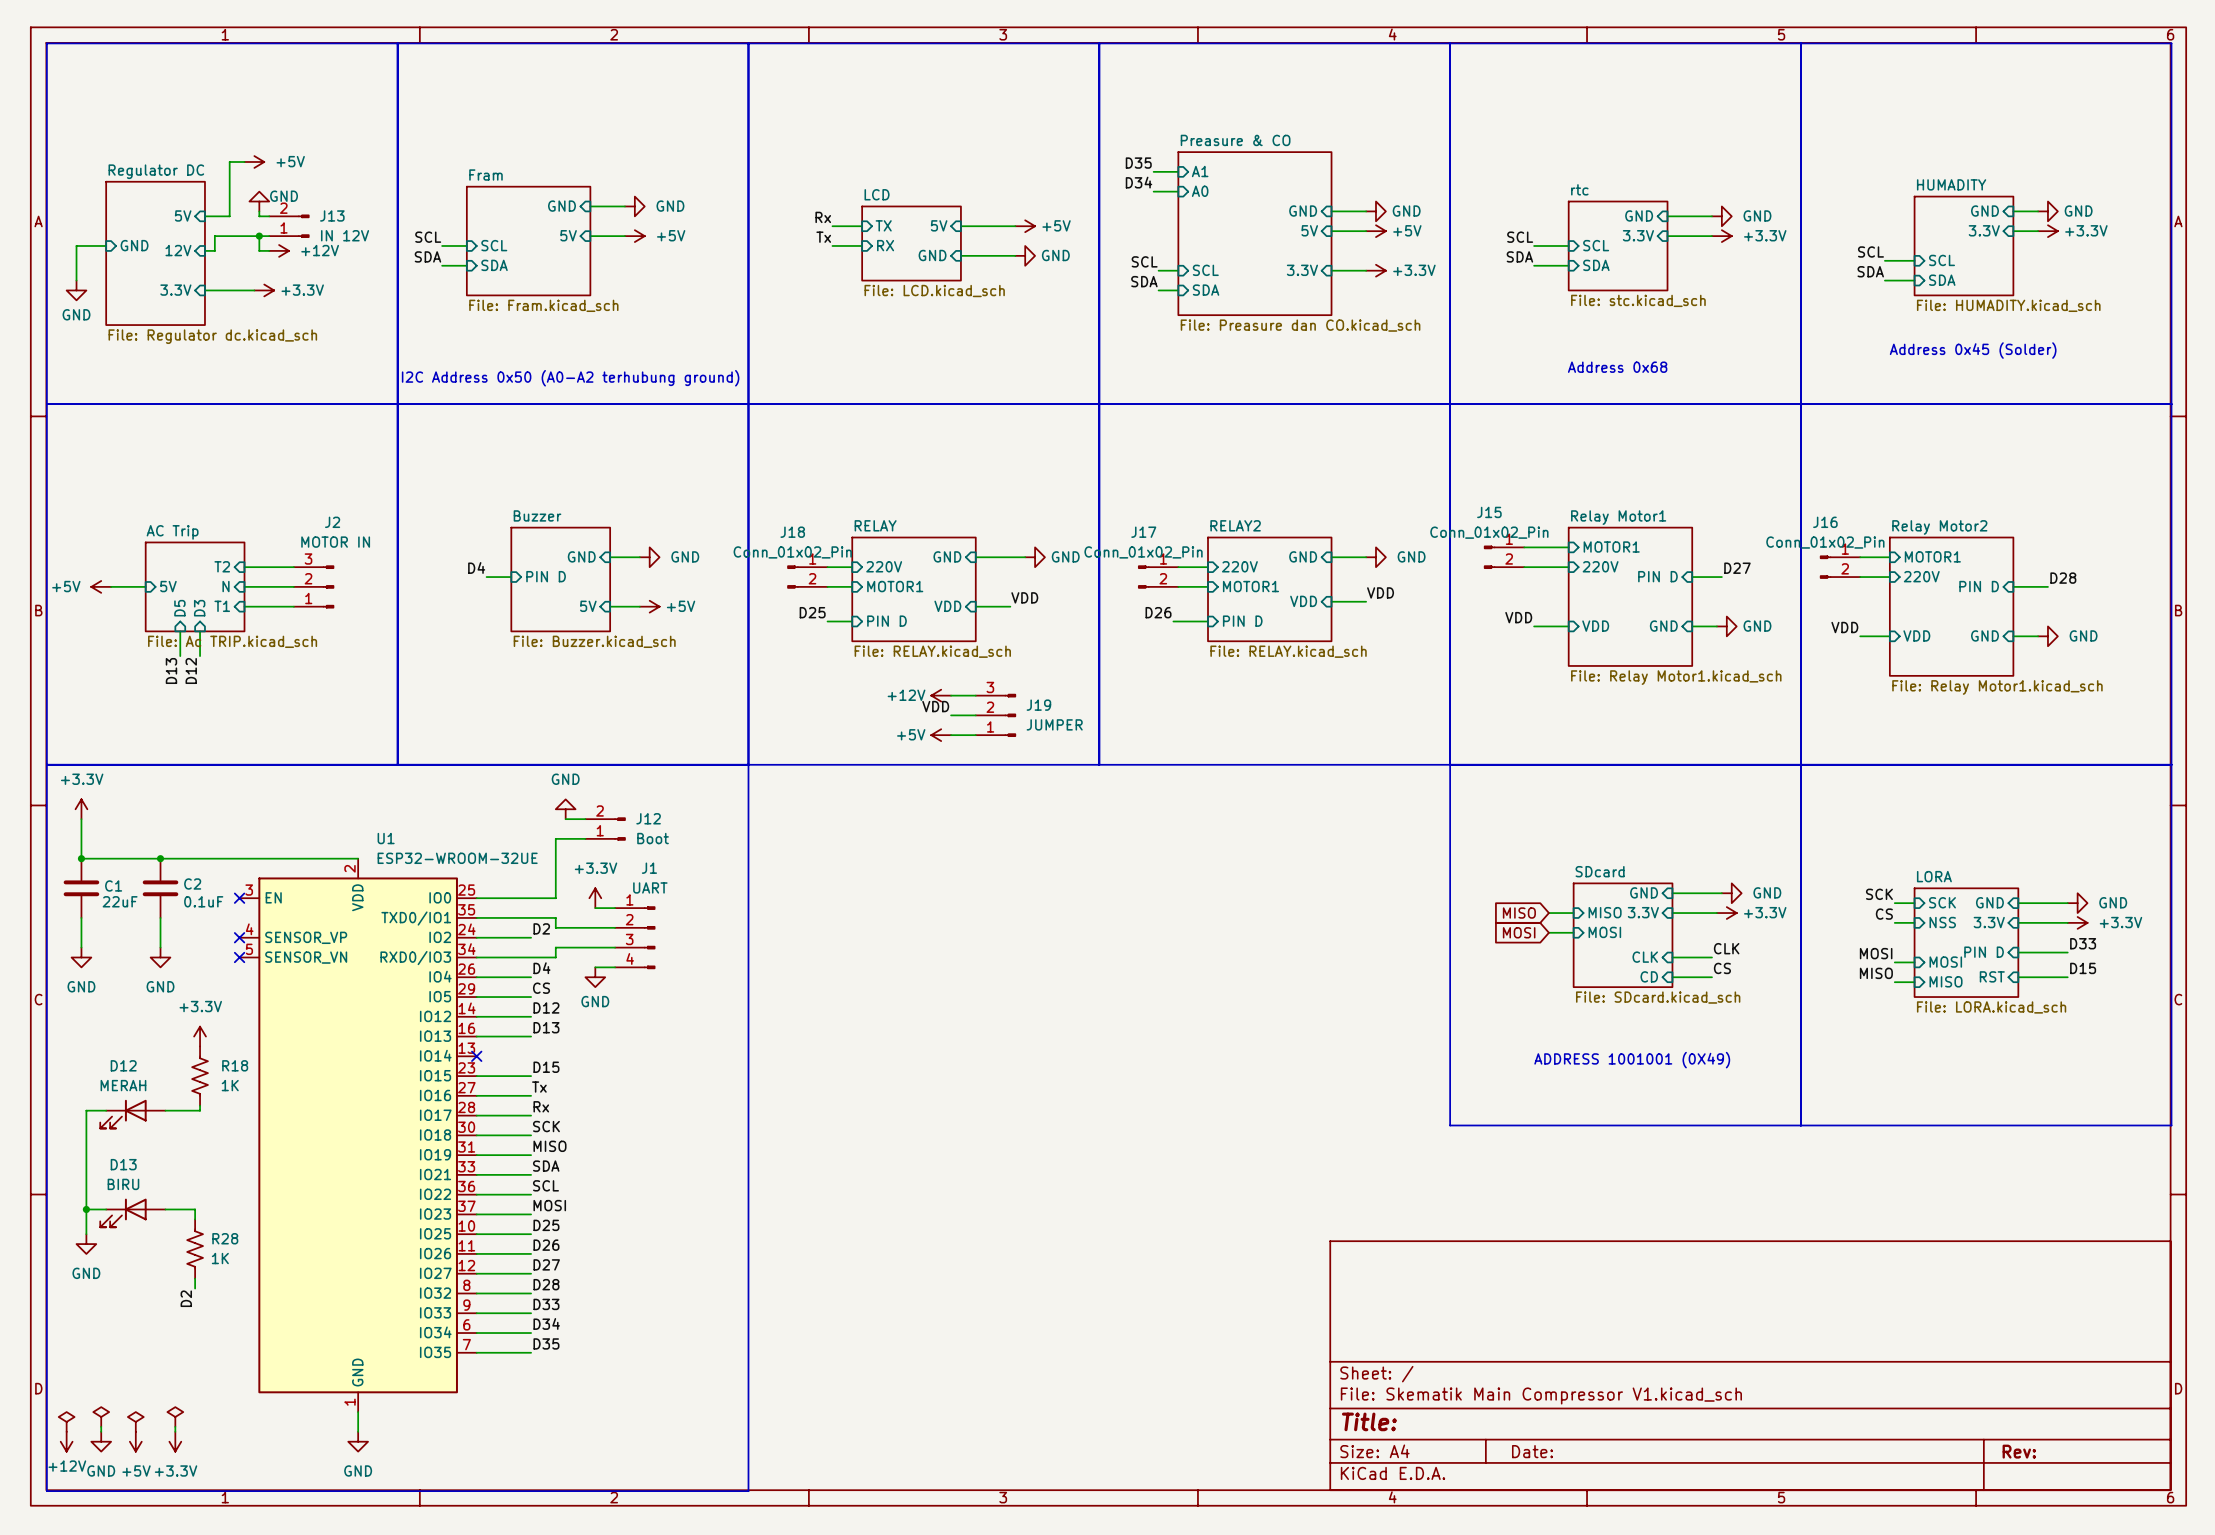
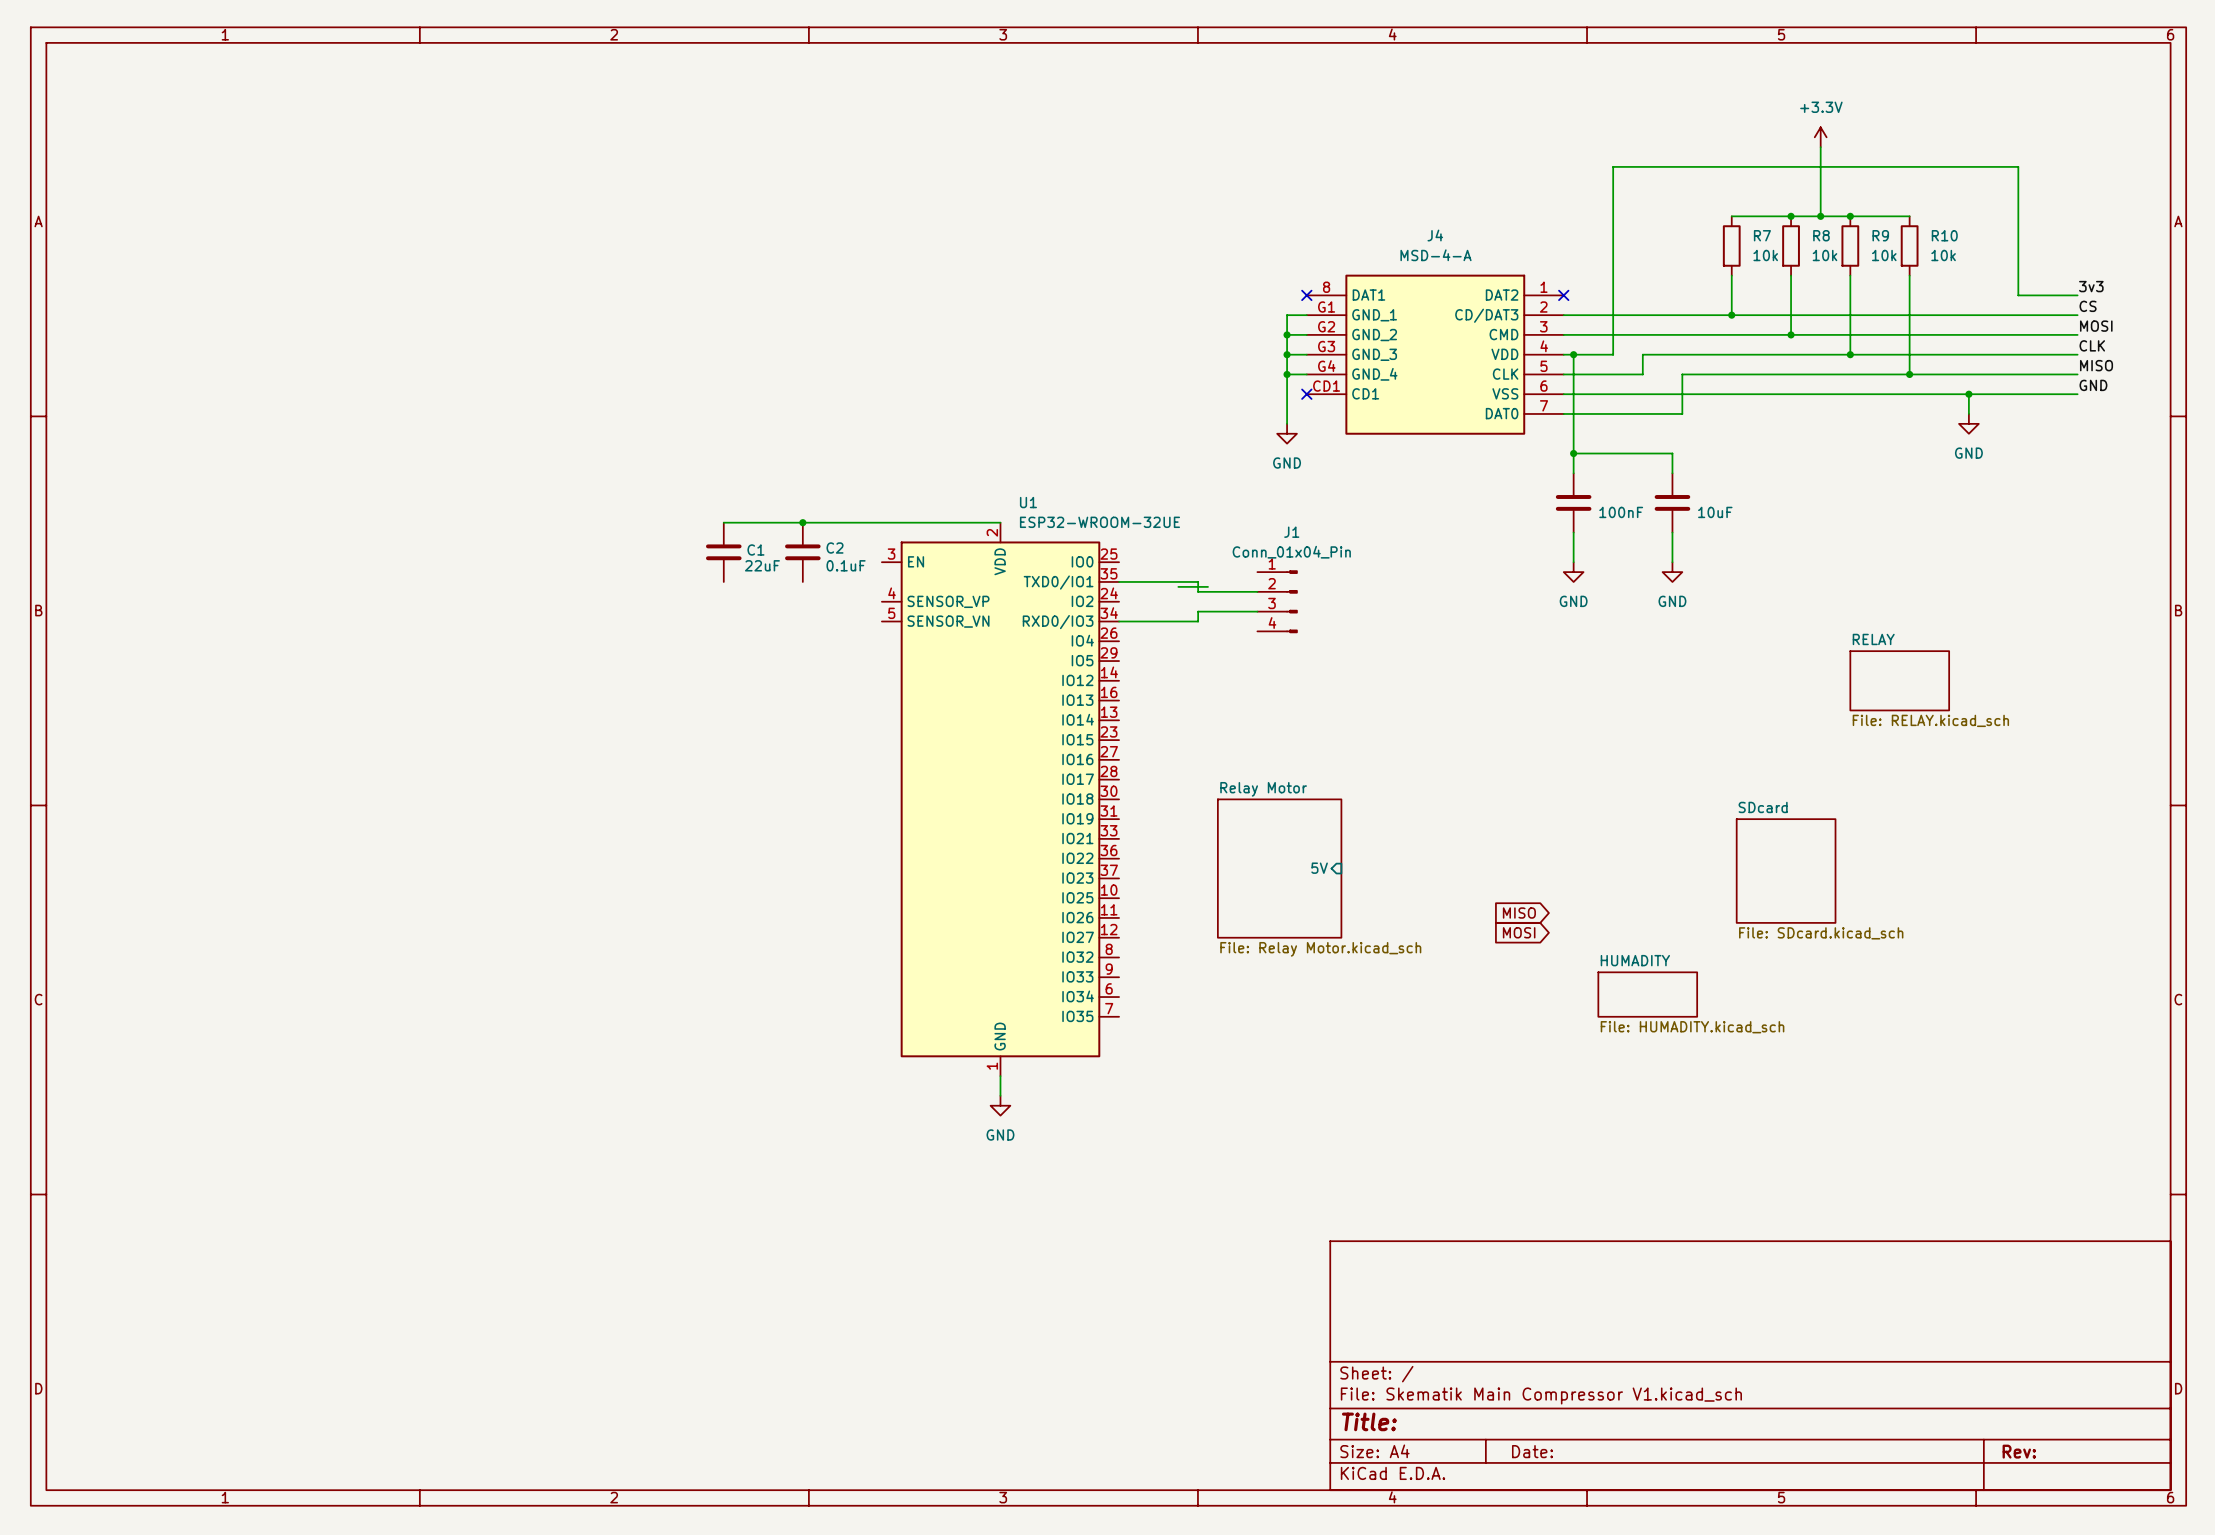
line: (397, 43) (397, 764) -> none
line: (748, 43) (748, 1491) (46, 1491) (46, 43) (2171, 43) (2171, 1125) (1450, 1125) (1450, 43) -> none
line: (1099, 43) (1099, 764) -> none
line: (1800, 43) (1800, 1125) -> none
power symbol: none -> +3.3V (1820, 137)
wire: none -> (1820, 147) (1820, 216)
wire: (244, 161) (229, 161) (229, 216) (204, 216) -> none
power symbol: +5V (254, 161) -> none
label: D35 (1138, 163) -> none
wire: (1153, 171) (1178, 171) -> none
sheet pin: A1 (1200, 171) -> none
label: D34 (1138, 182) -> none
wire: (1153, 191) (1178, 191) -> none
sheet pin: A0 (1200, 191) -> none
power symbol: GND (259, 201) -> none
sheet pin: GND (561, 206) -> none
wire: (590, 206) (624, 206) -> none
power symbol: GND (634, 206) -> none
wire: (259, 211) (259, 216) (269, 216) -> none
sheet pin: GND (1303, 211) -> none
wire: (1331, 211) (1366, 211) -> none
power symbol: GND (1376, 211) -> none
sheet pin: GND (1985, 211) -> none
wire: (2013, 211) (2038, 211) -> none
power symbol: GND (2047, 211) -> none
sheet pin: 5V (183, 215) -> none
sheet pin: GND (1639, 215) -> none
wire: (1667, 216) (1711, 216) -> none
power symbol: GND (1721, 216) -> none
wire: none -> (1731, 216) (1909, 216)
junction: none -> (1791, 216)
junction: none -> (1820, 216)
junction: none -> (1850, 216)
label: Rx (823, 217) -> none
sheet pin: TX (883, 225) -> none
sheet pin: 5V (939, 225) -> none
J13: IN 12V (289, 226) -> none
wire: (832, 226) (862, 226) -> none
wire: (960, 226) (1015, 226) -> none
power symbol: +5V (1025, 226) -> none
sheet pin: 5V (1309, 230) -> none
sheet pin: 3.3V (1984, 230) -> none
wire: (1331, 231) (1366, 231) -> none
power symbol: +5V (1376, 231) -> none
wire: (2013, 231) (2038, 231) -> none
power symbol: +3.3V (2047, 231) -> none
sheet Preasure & CO: File: Preasure dan CO.kicad_sch (1254, 233) -> none
sheet pin: 5V (568, 235) -> none
sheet pin: 3.3V (1638, 235) -> none
wire: (259, 236) (259, 250) (269, 250) -> none
junction: (259, 236) -> none
wire: (269, 236) (214, 236) (214, 250) (204, 250) -> none
wire: (590, 236) (624, 236) -> none
power symbol: +5V (634, 236) -> none
wire: (1667, 236) (1711, 236) -> none
power symbol: +3.3V (1721, 236) -> none
label: SCL (428, 237) -> none
label: Tx (823, 237) -> none
label: SCL (1520, 237) -> none
sheet Fram: File: Fram.kicad_sch (528, 241) -> none
sheet LCD: File: LCD.kicad_sch (911, 243) -> none
wire: (106, 245) (76, 245) (76, 280) -> none
sheet pin: GND (134, 245) -> none
wire: (442, 245) (466, 245) -> none
sheet pin: SCL (494, 245) -> none
wire: (832, 245) (862, 245) -> none
sheet pin: RX (885, 245) -> none
wire: (1534, 245) (1568, 245) -> none
sheet pin: SCL (1596, 245) -> none
sheet rtc: File: stc.kicad_sch (1618, 245) -> none
R7: none -> 10k (1731, 245)
R8: none -> 10k (1791, 245)
R9: none -> 10k (1850, 245)
R10: none -> 10k (1909, 245)
sheet HUMADITY: File: HUMADITY.kicad_sch (1963, 245) -> none
sheet pin: 12V (178, 250) -> none
power symbol: +12V (279, 250) -> none
label: SCL (1870, 251) -> none
sheet Regulator DC: File: Regulator dc.kicad_sch (155, 253) -> none
sheet pin: GND (932, 255) -> none
wire: (960, 255) (1015, 255) -> none
power symbol: GND (1025, 255) -> none
label: SDA (427, 256) -> none
label: SDA (1519, 256) -> none
wire: (1884, 260) (1914, 260) -> none
sheet pin: SCL (1942, 260) -> none
label: SCL (1144, 261) -> none
wire: (442, 265) (466, 265) -> none
sheet pin: SDA (494, 265) -> none
wire: (1534, 265) (1568, 265) -> none
sheet pin: SDA (1596, 265) -> none
wire: (1158, 270) (1178, 270) -> (1287, 334) (1306, 334)
sheet pin: SCL (1205, 270) -> none
sheet pin: 3.3V (1302, 270) -> none
wire: (1331, 270) (1366, 270) -> none
power symbol: +3.3V (1376, 270) -> none
label: SDA (1870, 271) -> none
wire: none -> (1731, 275) (1731, 315)
wire: none -> (1791, 275) (1791, 334)
wire: none -> (1850, 275) (1850, 354)
wire: none -> (1909, 275) (1909, 374)
wire: (1884, 280) (1914, 280) -> none
sheet pin: SDA (1942, 280) -> none
label: SDA (1144, 281) -> none
label: none -> 3v3 (2091, 286)
power symbol: GND (76, 290) -> none
sheet pin: 3.3V (175, 290) -> none
wire: (204, 290) (254, 290) -> none
power symbol: +3.3V (264, 290) -> none
wire: (1158, 290) (1178, 290) -> (1287, 354) (1306, 354)
sheet pin: SDA (1206, 290) -> none
no-connect mark: none -> (1306, 295)
no-connect mark: none -> (1563, 295)
wire: none -> (2077, 295) (2018, 295) (2018, 166) (1613, 166) (1613, 354) (1563, 354)
label: none -> CS (2088, 306)
wire: none -> (1306, 315) (1287, 315) (1287, 423)
wire: none -> (1563, 315) (2077, 315)
junction: none -> (1731, 315)
label: none -> MOSI (2096, 326)
junction: none -> (1287, 334)
wire: none -> (1563, 334) (2077, 334)
junction: none -> (1791, 334)
label: none -> CLK (2092, 345)
text: Address 0x45 (Solder) (1973, 350) -> none
junction: none -> (1287, 354)
J4: none -> MSD-4-A (1435, 354)
wire: none -> (1573, 354) (1573, 473)
junction: none -> (1573, 354)
junction: none -> (1850, 354)
wire: none -> (2077, 354) (1642, 354) (1642, 374) (1563, 374)
label: none -> MISO (2096, 365)
text: Address 0x68 (1617, 367) -> none
wire: none -> (1287, 374) (1306, 374)
junction: none -> (1287, 374)
junction: none -> (1909, 374)
wire: none -> (2077, 374) (1682, 374) (1682, 413) (1563, 413)
text: I2C Address 0x50 (A0-A2 terhubung ground) (570, 378) -> none
label: none -> GND (2093, 385)
no-connect mark: none -> (1306, 394)
wire: none -> (1563, 394) (2077, 394)
wire: none -> (1968, 394) (1968, 413)
junction: none -> (1968, 394)
line: (46, 404) (2171, 404) -> none
power symbol: none -> GND (1968, 423)
power symbol: none -> GND (1287, 433)
wire: none -> (1573, 453) (1672, 453) (1672, 473)
junction: none -> (1573, 453)
part: none -> 100nF (1573, 502)
part: none -> 10uF (1672, 502)
wire: none -> (723, 522) (1000, 522)
junction: none -> (802, 522)
wire: none -> (1573, 532) (1573, 562)
wire: none -> (1672, 532) (1672, 562)
wire: (1524, 547) (1568, 547) -> none
sheet pin: MOTOR1 (1611, 547) -> none
sheet pin: GND (581, 556) -> none
sheet pin: GND (947, 556) -> none
sheet pin: GND (1303, 556) -> none
sheet pin: MOTOR1 (1932, 556) -> none
wire: (610, 557) (639, 557) -> none
power symbol: GND (649, 557) -> none
power symbol: GND (1035, 557) -> none
wire: (1331, 557) (1366, 557) -> none
power symbol: GND (1376, 557) -> none
J15: Conn_01x02_Pin (1504, 557) -> none
wire: (1860, 557) (1889, 557) -> none
sheet pin: T2 (222, 566) -> none
sheet pin: 220V (884, 566) -> none
sheet pin: 220V (1239, 566) -> none
sheet pin: 220V (1600, 566) -> none
wire: (244, 567) (293, 567) -> none
label: D4 (476, 567) -> none
wire: (827, 567) (852, 567) -> none
wire: (1178, 567) (1208, 567) -> none
wire: (1524, 567) (1568, 567) -> none
J16: Conn_01x02_Pin (1840, 567) -> none
label: D27 (1737, 568) -> none
power symbol: none -> GND (1573, 572)
sheet pin: PIN D (546, 576) -> none
sheet pin: PIN D (1657, 576) -> none
sheet pin: 220V (1921, 576) -> none
wire: (486, 577) (511, 577) -> none
J18: Conn_01x02_Pin (807, 577) -> none
J17: Conn_01x02_Pin (1158, 577) -> none
wire: (1692, 577) (1721, 577) -> none
wire: (1860, 577) (1889, 577) -> none
label: D28 (2063, 578) -> none
sheet Buzzer: File: Buzzer.kicad_sch (560, 579) -> none
wire: none -> (1119, 581) (1198, 581) (1198, 591) (1257, 591)
power symbol: +5V (101, 586) -> none
wire: (111, 586) (145, 586) -> none
sheet pin: 5V (168, 586) -> none
sheet AC Trip: File: Ac TRIP.kicad_sch (195, 586) -> none
sheet pin: N (226, 586) -> none
wire: (244, 586) (293, 586) -> none
J2: MOTOR IN (313, 586) -> none
wire: (827, 586) (852, 586) -> none
sheet pin: MOTOR1 (895, 586) -> none
sheet pin: MOTOR1 (1250, 586) -> none
sheet pin: PIN D (1979, 586) -> none
wire: (2013, 586) (2047, 586) -> none
sheet RELAY: File: RELAY.kicad_sch (914, 589) -> none
sheet RELAY2: File: RELAY.kicad_sch (1269, 589) -> none
label: VDD (1380, 592) -> none
sheet Relay Motor1: File: Relay Motor1.kicad_sch (1630, 596) -> none
label: VDD (1024, 597) -> none
sheet pin: VDD (1303, 601) -> none
wire: (1331, 601) (1366, 601) -> none
sheet pin: T1 (222, 606) -> none
wire: (244, 606) (293, 606) -> none
sheet pin: 5V (588, 606) -> none
wire: (610, 606) (639, 606) -> none
power symbol: +5V (649, 606) -> none
sheet pin: VDD (947, 606) -> none
sheet Relay Motor2: File: Relay Motor1.kicad_sch (1951, 606) -> none
sheet pin: D5 (179, 608) -> none
sheet pin: D3 (199, 608) -> none
label: D25 (812, 612) -> none
label: D26 (1158, 612) -> none
label: VDD (1518, 617) -> none
wire: (827, 621) (852, 621) -> none
sheet pin: PIN D (886, 621) -> none
wire: none -> (1119, 621) (1173, 621)
wire: (1198, 621) (1208, 621) -> (1198, 621) (1198, 611) (1257, 611)
sheet pin: PIN D (1242, 621) -> none
wire: (1534, 626) (1568, 626) -> none
sheet pin: VDD (1595, 626) -> none
sheet pin: GND (1663, 626) -> none
wire: (1692, 626) (1716, 626) -> none
power symbol rotation: 0° (1726, 626) -> 90° clockwise (1672, 572)
power symbol position: GND (1726, 626) -> GND (1672, 572)
label: VDD (1844, 627) -> none
wire: (180, 631) (180, 656) -> none
wire: (200, 631) (200, 656) -> none
sheet pin: VDD (1916, 635) -> none
sheet pin: GND (1985, 635) -> none
wire: (1860, 636) (1889, 636) -> none
wire: (2013, 636) (2038, 636) -> none
power symbol: GND (2047, 636) -> none
label: D13 (171, 670) -> none
label: D12 (191, 670) -> none
sheet RELAY: none -> File: RELAY.kicad_sch (1899, 680)
power symbol: +12V (941, 695) -> none
label: VDD (935, 706) -> none
J19: JUMPER (995, 715) -> none
power symbol: +5V (941, 735) -> none
line: (46, 764) (2171, 764) -> none
power symbol: +3.3V (81, 809) -> none
power symbol: GND (565, 809) -> none
wire: (81, 819) (81, 858) (358, 858) -> none
wire: (565, 819) (585, 819) -> none
J12: Boot (605, 829) -> none
wire: (585, 838) (555, 838) (555, 898) (476, 898) -> none
junction: (81, 858) -> none
junction: (160, 858) -> none
sheet Relay Motor: none -> File: Relay Motor.kicad_sch (1279, 868)
sheet pin: none -> 5V (1319, 868)
J1 value: UART (650, 887) -> Conn_01x04_Pin (1291, 552)
C1 position: (81, 888) -> (723, 552)
C2 position: (160, 888) -> (802, 552)
sheet pin: GND (1644, 892) -> none
wire: (1672, 893) (1721, 893) -> none
power symbol: GND (1731, 893) -> none
label: SCK (1879, 894) -> none
no-connect mark: (239, 898) -> none
power symbol: +3.3V (595, 898) -> none
sheet pin: SCK (1942, 902) -> none
sheet pin: GND (1989, 902) -> none
wire: (1894, 903) (1914, 903) -> none
wire: (2018, 903) (2067, 903) -> none
power symbol: GND (2077, 903) -> none
wire: (595, 908) (615, 908) -> none
sheet pin: MISO (1605, 912) -> none
sheet pin: 3.3V (1643, 912) -> none
wire: (1548, 913) (1573, 913) -> none
wire: (1672, 913) (1716, 913) -> none
power symbol: +3.3V (1726, 913) -> none
label: CS (1884, 914) -> none
wire: (81, 917) (81, 947) -> none
wire: (160, 917) (160, 947) -> none
wire: (476, 917) (555, 917) (555, 927) (615, 927) -> none
wire: (1894, 922) (1914, 922) -> none
sheet pin: NSS (1942, 922) -> none
sheet pin: 3.3V (1989, 922) -> none
wire: (2018, 922) (2067, 922) -> none
power symbol: +3.3V (2077, 922) -> none
label: D2 (541, 928) -> none
wire: (1548, 932) (1573, 932) -> none
sheet pin: MOSI (1604, 932) -> none
sheet SDcard position: (1623, 935) -> (1786, 871)
no-connect mark: (239, 937) -> none
wire: (476, 937) (531, 937) -> none
J1 position: (635, 937) -> (1277, 601)
sheet LORA: File: LORA.kicad_sch (1966, 942) -> none
label: D33 (2083, 943) -> none
wire: (615, 947) (555, 947) (555, 957) (476, 957) -> none
label: CLK (1726, 948) -> none
sheet pin: PIN D (1984, 952) -> none
wire: (2018, 952) (2067, 952) -> none
label: MOSI (1876, 953) -> none
power symbol: GND (81, 957) -> none
power symbol: GND (160, 957) -> none
no-connect mark: (239, 957) -> none
sheet pin: CLK (1645, 957) -> none
wire: (1672, 957) (1711, 957) -> none
wire: (1894, 962) (1914, 962) -> none
sheet pin: MOSI (1945, 962) -> none
wire: (595, 967) (615, 967) -> none
label: D4 (541, 968) -> none
label: CS (1722, 968) -> none
label: D15 (2083, 968) -> none
label: MISO (1876, 973) -> none
sheet pin: CD (1649, 976) -> none
sheet pin: RST (1992, 976) -> none
wire: (476, 977) (531, 977) -> none
power symbol: GND (595, 977) -> none
wire: (1672, 977) (1711, 977) -> none
wire: (2018, 977) (2067, 977) -> none
sheet pin: MISO (1946, 981) -> none
wire: (1894, 982) (1914, 982) -> none
label: CS (541, 988) -> none
sheet HUMADITY: none -> File: HUMADITY.kicad_sch (1647, 994)
wire: (476, 997) (531, 997) -> none
label: D12 (546, 1007) -> none
wire: (476, 1016) (531, 1016) -> none
label: D13 (546, 1027) -> none
power symbol: +3.3V (200, 1036) -> none
wire: (476, 1036) (531, 1036) -> none
no-connect mark: (476, 1056) -> none
text: ADDRESS 1001001 (0X49) (1632, 1060) -> none
label: D15 (546, 1067) -> none
R18: 1K (200, 1076) -> none
wire: (476, 1076) (531, 1076) -> none
wire: none -> (1000, 1076) (1000, 1095)
label: Tx (539, 1087) -> none
wire: (476, 1095) (531, 1095) -> none
wire: (200, 1105) (200, 1110) (165, 1110) -> none
power symbol: none -> GND (1000, 1105)
label: Rx (541, 1106) -> none
wire: (106, 1110) (86, 1110) (86, 1234) -> none
D12: MERAH (132, 1114) -> none
wire: (476, 1115) (531, 1115) -> none
label: SCK (546, 1126) -> none
U1 position: (358, 1135) -> (1000, 799)
wire: (476, 1135) (531, 1135) -> none
label: MISO (549, 1146) -> none
wire: (476, 1155) (531, 1155) -> none
label: SDA (546, 1166) -> none
wire: (476, 1174) (531, 1174) -> none
label: SCL (545, 1185) -> none
wire: (476, 1194) (531, 1194) -> none
label: MOSI (549, 1205) -> none
wire: (86, 1209) (106, 1209) -> none
junction: (86, 1209) -> none
wire: (165, 1209) (195, 1209) (195, 1219) -> none
D13: BIRU (132, 1212) -> none
wire: (476, 1214) (531, 1214) -> none
label: D25 (546, 1225) -> none
wire: (476, 1234) (531, 1234) -> none
power symbol: GND (86, 1244) -> none
label: D26 (546, 1245) -> none
R28: 1K (195, 1249) -> none
wire: (476, 1253) (531, 1253) -> none
label: D27 (546, 1264) -> none
wire: (476, 1273) (531, 1273) -> none
wire: (195, 1278) (195, 1288) -> none
label: D28 (546, 1284) -> none
wire: (476, 1293) (531, 1293) -> none
label: D2 (186, 1298) -> none
label: D33 (546, 1304) -> none
wire: (476, 1313) (531, 1313) -> none
label: D34 (546, 1323) -> none
wire: (476, 1333) (531, 1333) -> none
label: D35 (546, 1343) -> none
wire: (476, 1352) (531, 1352) -> none
wire: (358, 1412) (358, 1431) -> none
power symbol: (101, 1417) -> none
power symbol: (175, 1417) -> none
power symbol: (66, 1421) -> none
power symbol: (135, 1421) -> none
wire: (101, 1426) (101, 1431) -> none
wire: (175, 1426) (175, 1431) -> none
power symbol: +12V (66, 1441) -> none
power symbol: GND (101, 1441) -> none
power symbol: +5V (135, 1441) -> none
power symbol: +3.3V (175, 1441) -> none
power symbol: GND (358, 1441) -> none

